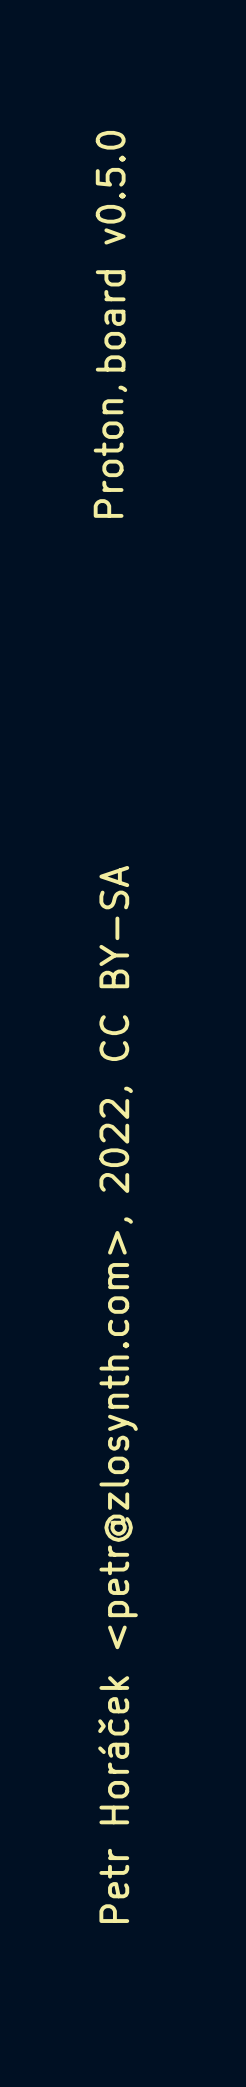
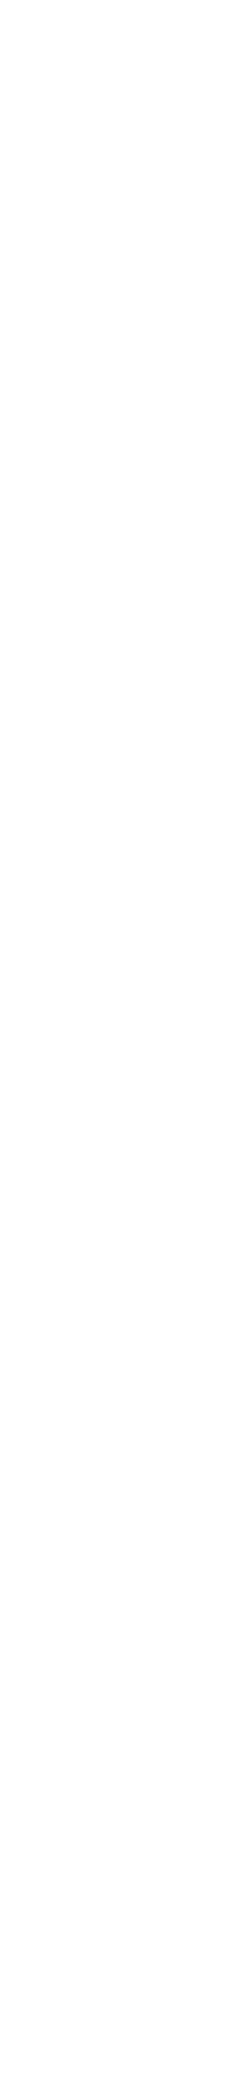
text: board v0.5.0 (110, 251) -> none
text: Proton, (110, 451) -> none
text: Petr Horáček <petr@zlosynth.com>, 2022, CC BY-SA (118, 1394) -> none

